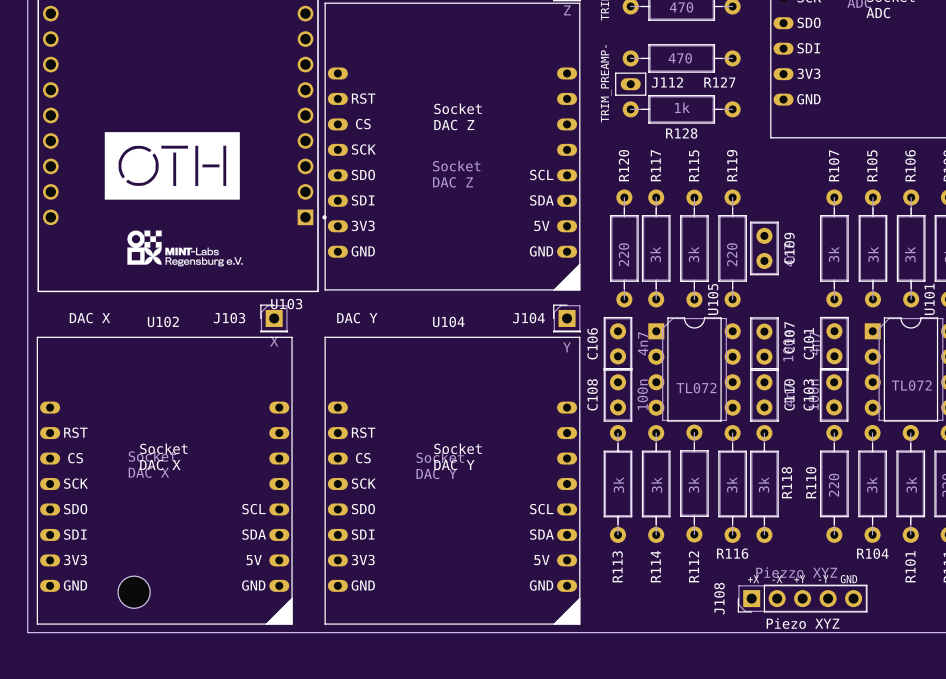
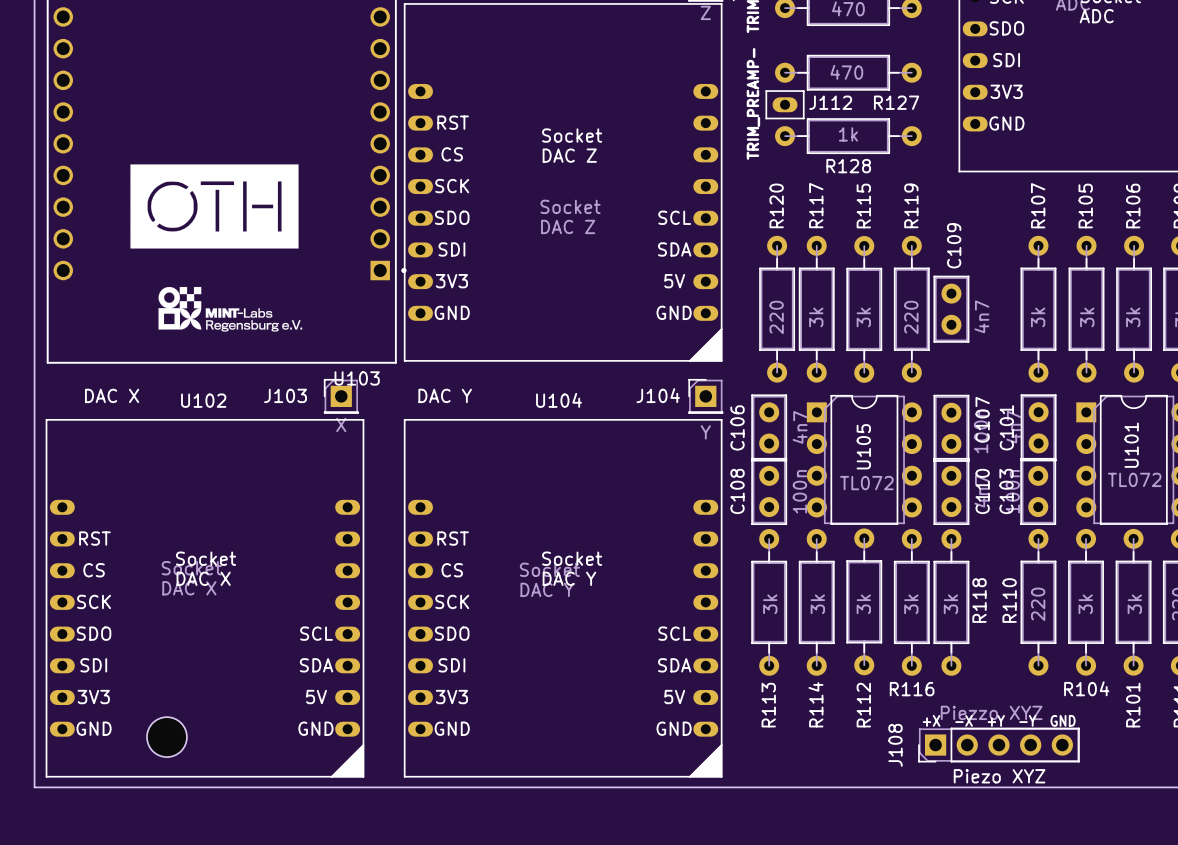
C109 name position: C109 (789, 248) -> C109 (954, 245)
U105 name position: U105 (713, 299) -> U105 (863, 446)
U101 name position: U101 (929, 299) -> U101 (1131, 445)

